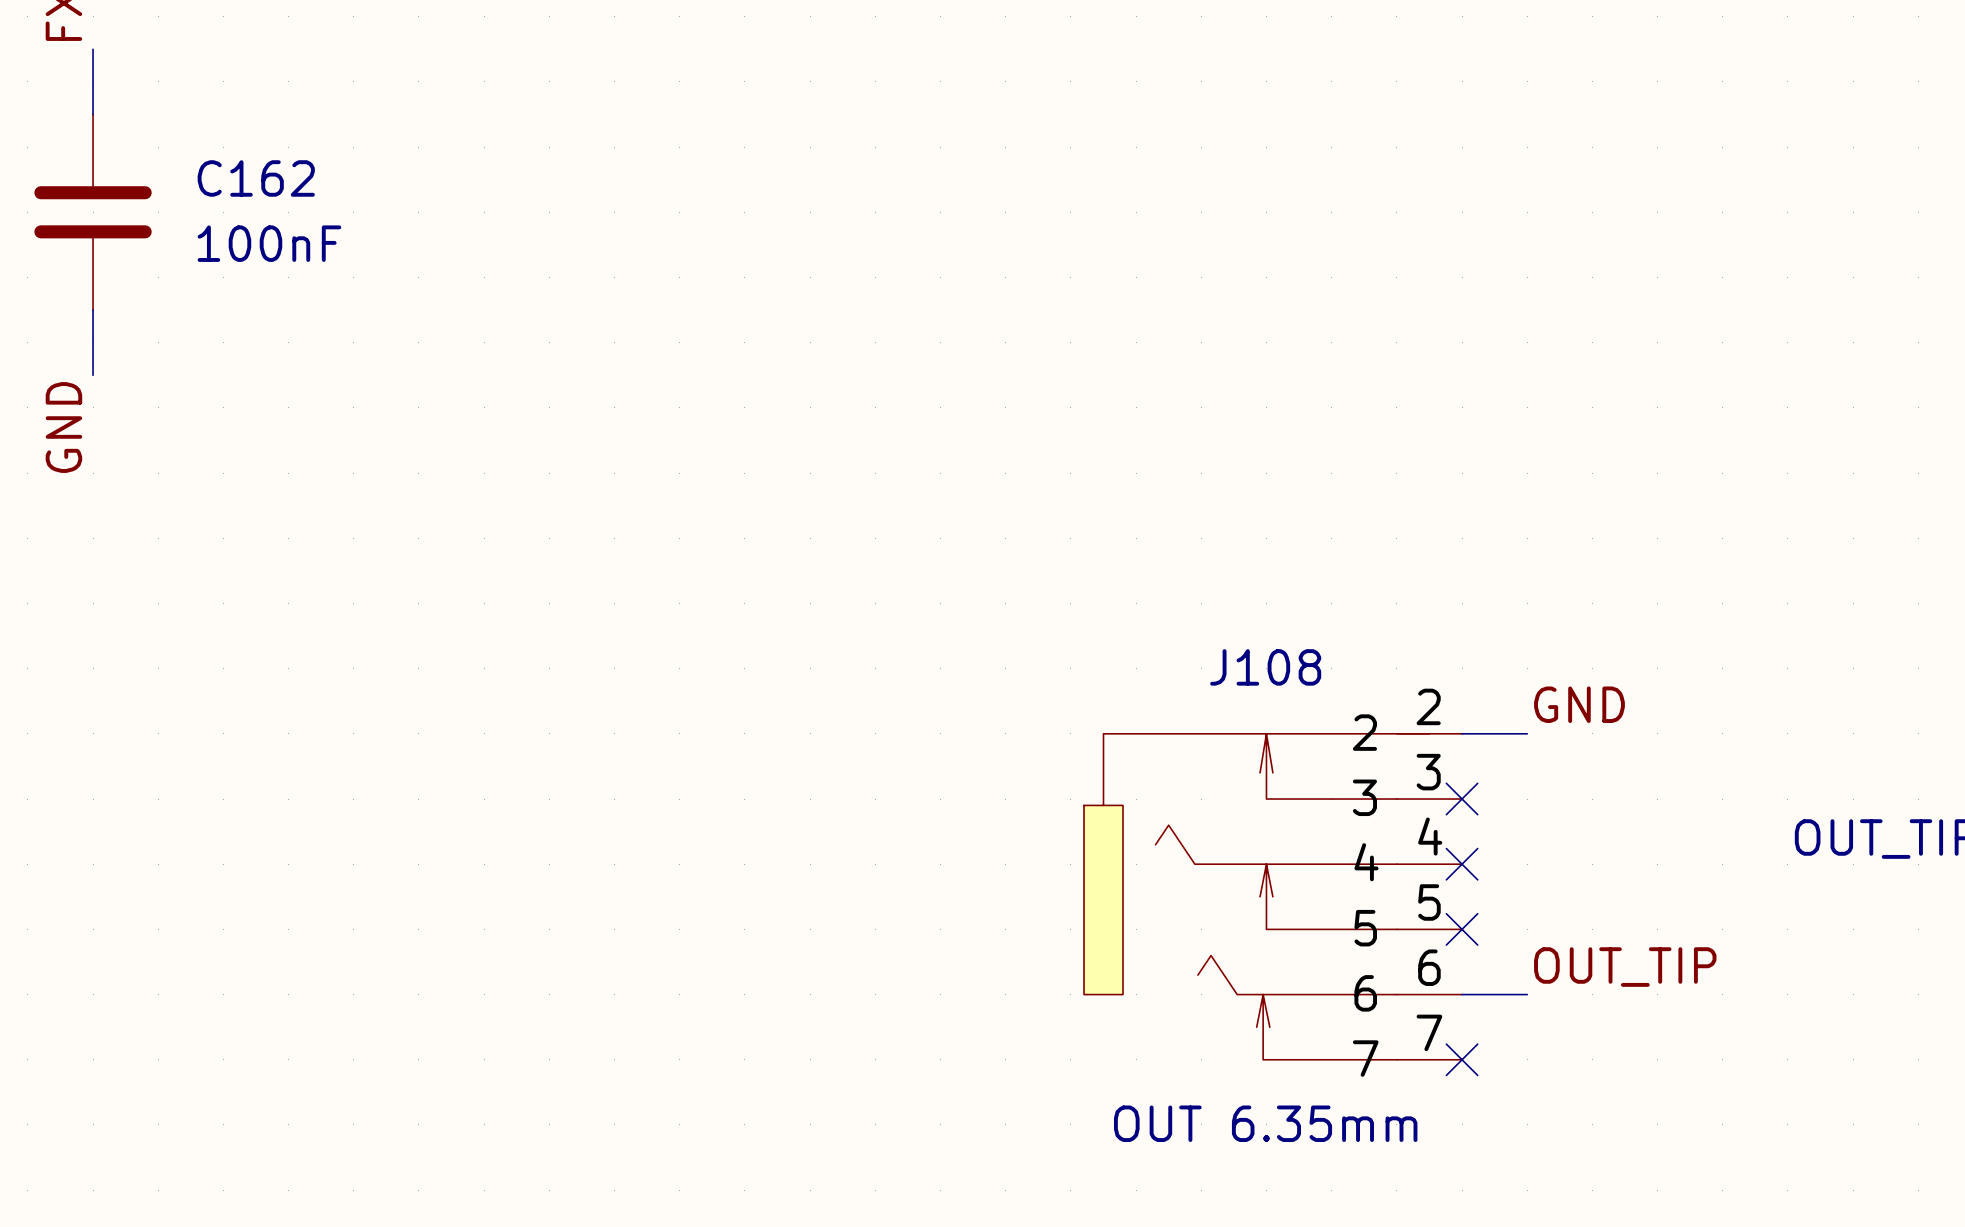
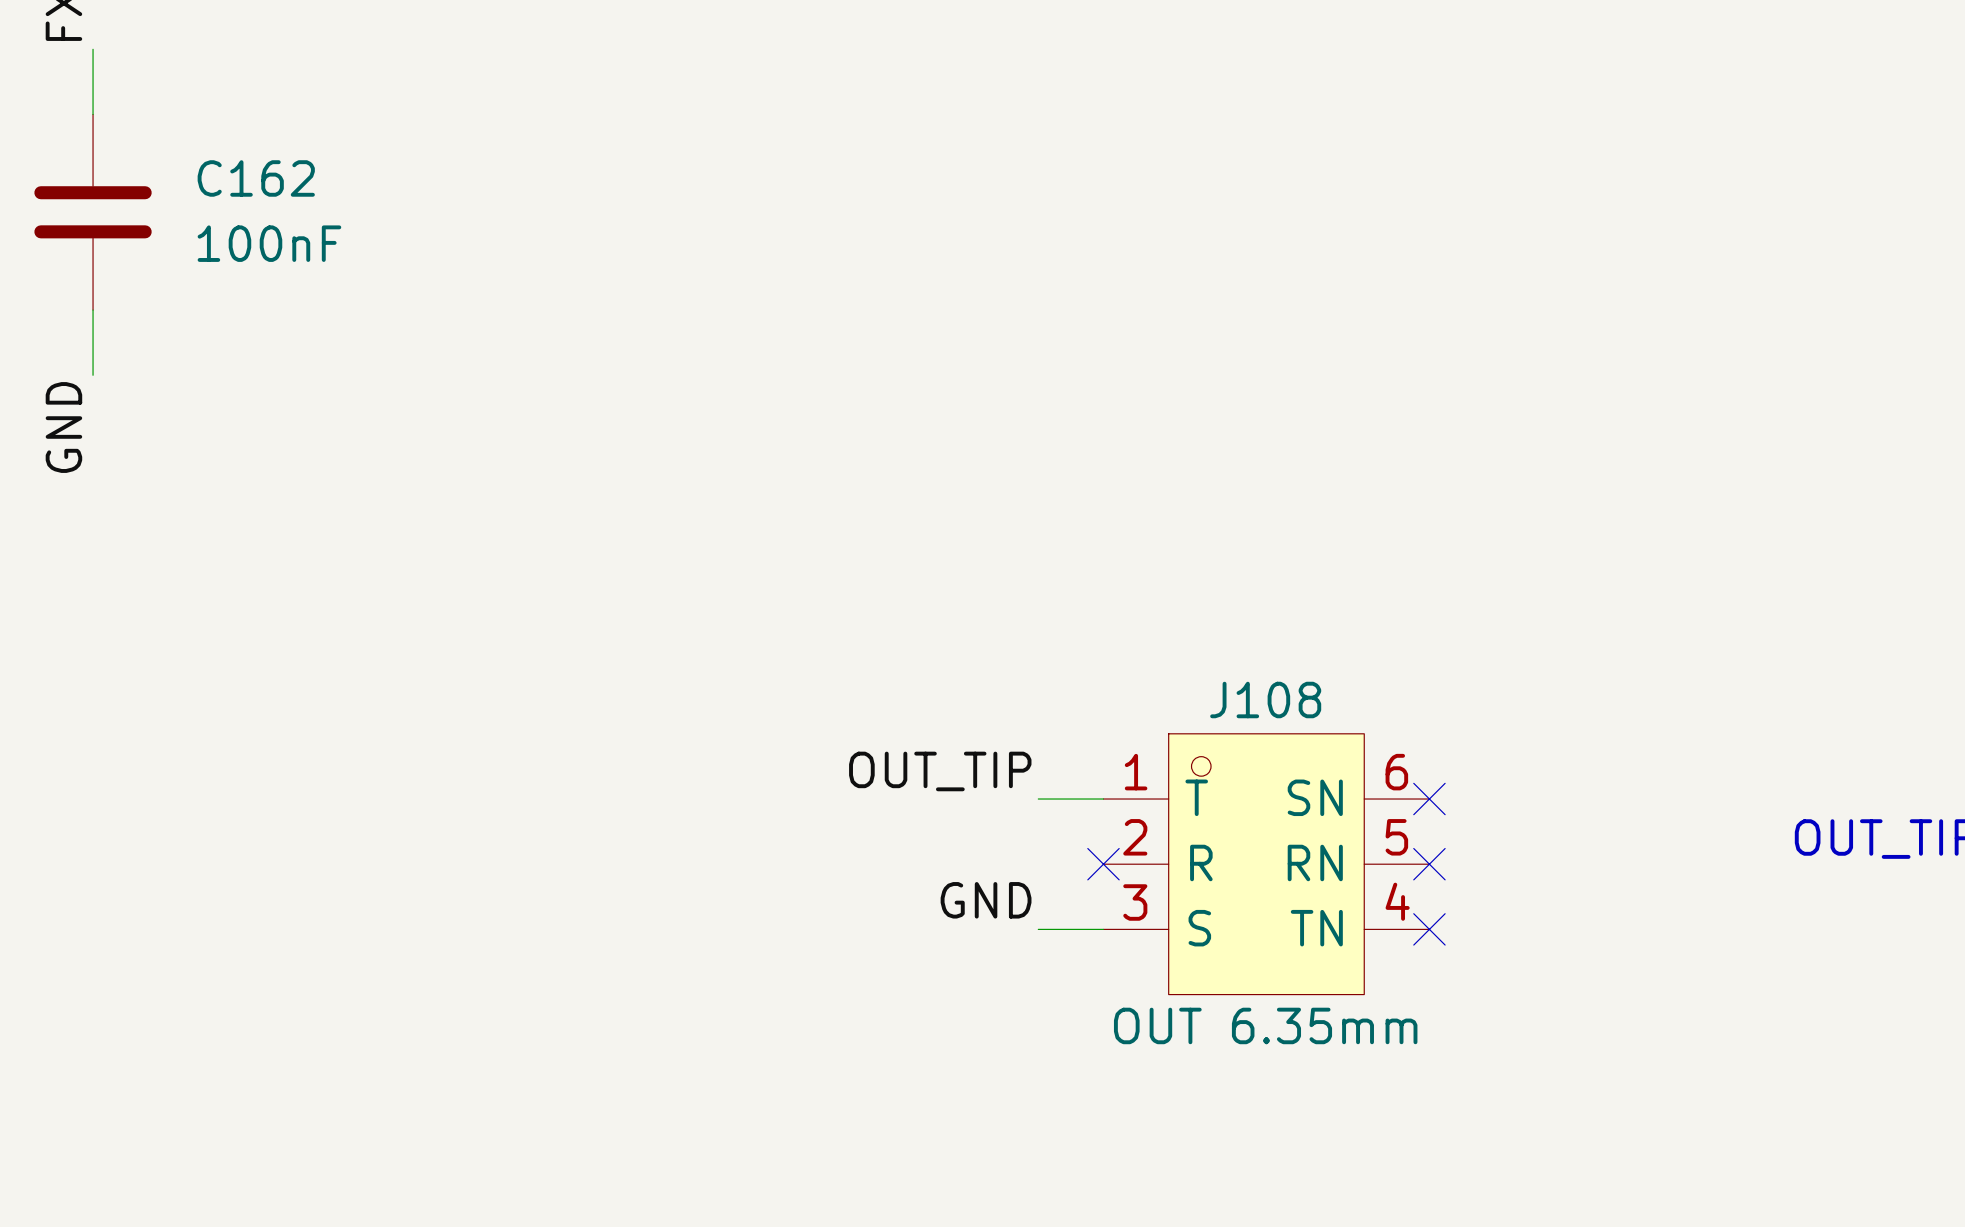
J108 name position: J108 (1265, 667) -> J108 (1265, 700)
label position: GND (1579, 704) -> GND (986, 900)
J108 symbol: [1083, 733, 1463, 1060] -> [1103, 733, 1430, 995]
wire: (1462, 733) (1527, 733) -> (1038, 799) (1103, 799)
no-connect mark position: (1462, 799) -> (1429, 799)
no-connect mark: none -> (1103, 864)
no-connect mark position: (1462, 864) -> (1429, 864)
no-connect mark position: (1462, 929) -> (1429, 929)
label position: OUT_TIP (1625, 967) -> OUT_TIP (940, 771)
wire: (1462, 994) (1527, 994) -> (1038, 929) (1103, 929)
no-connect mark: (1462, 1059) -> none
J108 value position: OUT 6.35mm (1265, 1123) -> OUT 6.35mm (1265, 1025)

